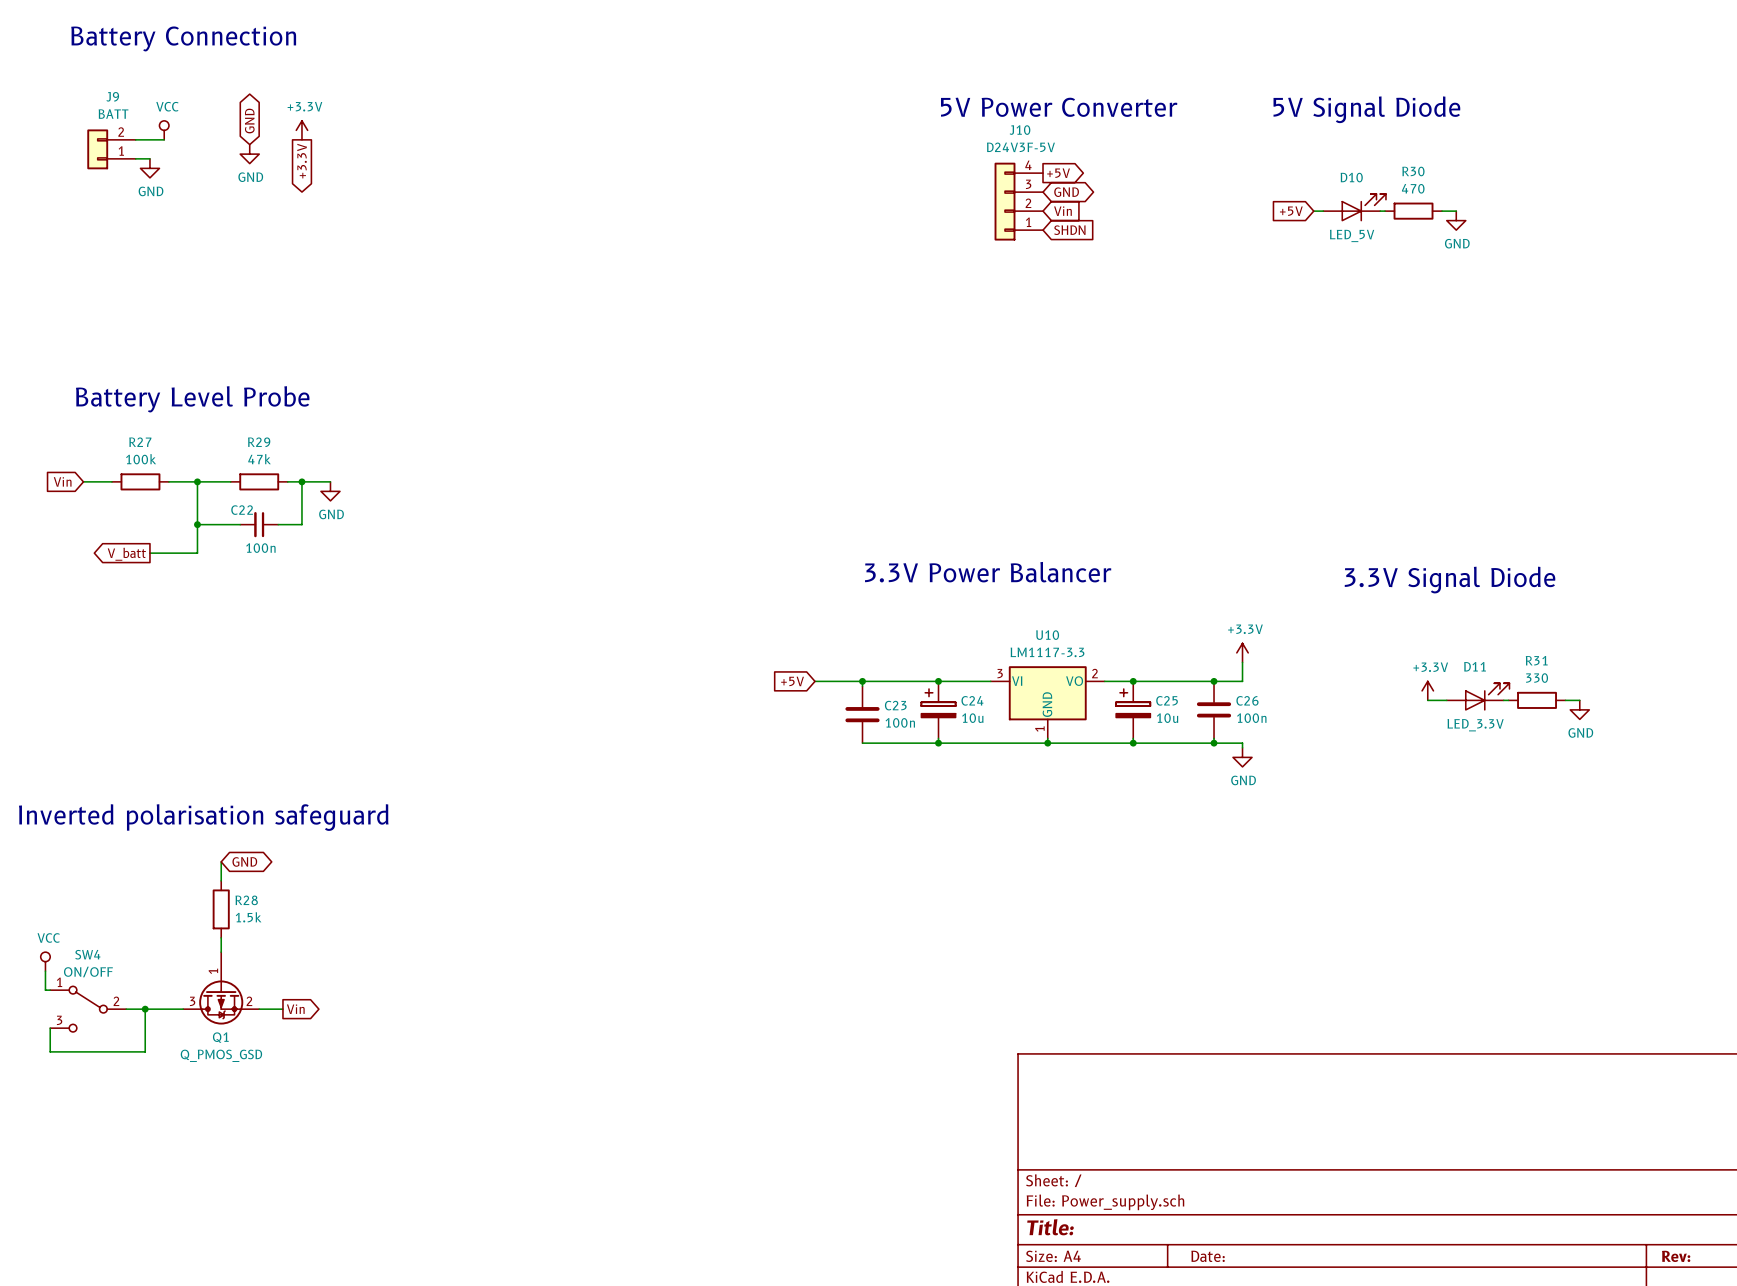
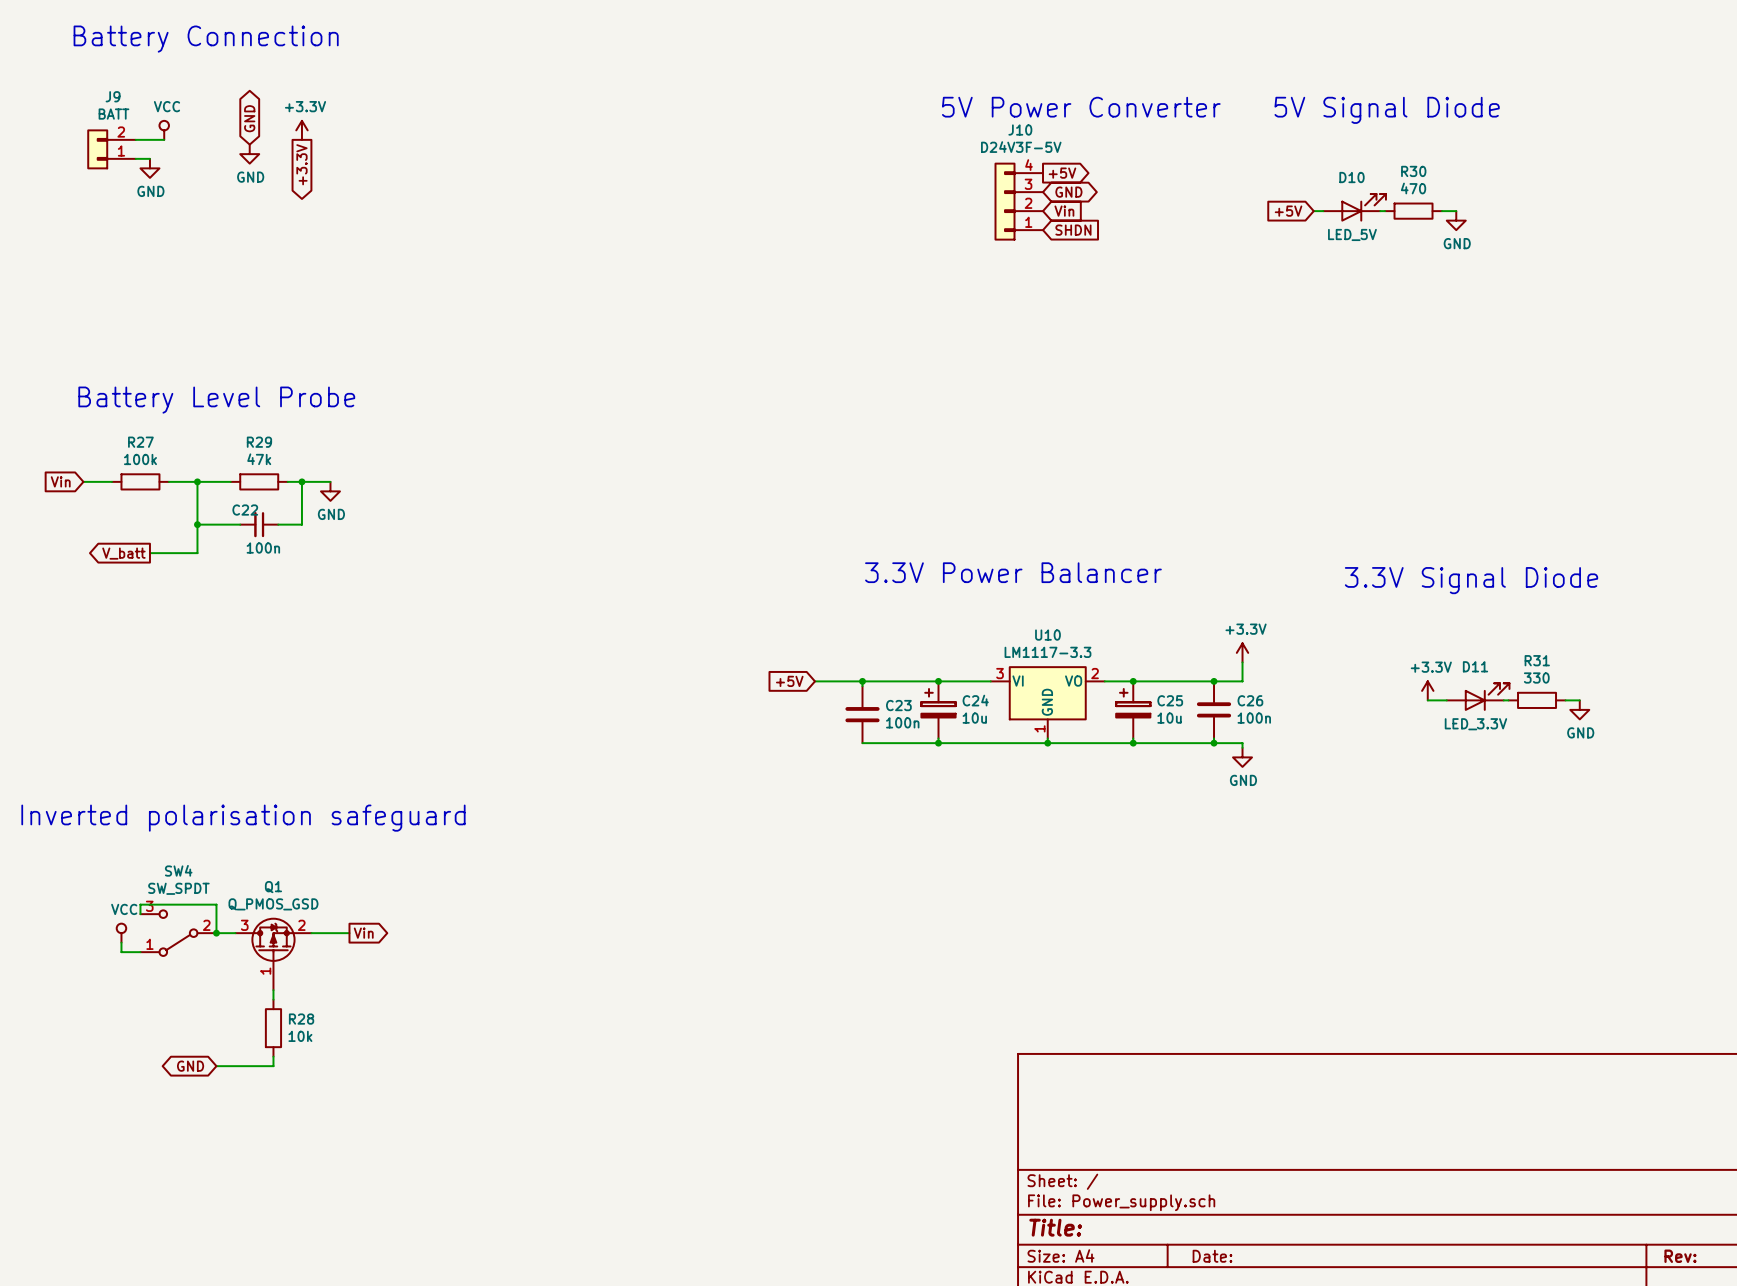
wire: (221, 861) (221, 880) -> none
global label: GND (244, 861) -> none
R28 position: (221, 909) -> (273, 1028)
wire: none -> (140, 914) (140, 904) (216, 904) (216, 933) (235, 933)
R28 value: 1.5k (248, 917) -> 10k (300, 1036)
junction: none -> (216, 933)
wire: none -> (311, 933) (349, 933)
wire: (221, 937) (221, 952) -> none
wire: none -> (121, 942) (121, 952) (140, 952)
power symbol position: VCC (45, 961) -> VCC (121, 933)
wire: (45, 971) (45, 990) (50, 990) -> none
SW4 value: ON/OFF (88, 972) -> SW_SPDT (178, 888)
Q1 position: (221, 988) -> (273, 953)
wire: none -> (273, 990) (273, 999)
Q1 flip: as is (221, 1002) -> up-down (273, 939)
SW4 flip: as is (88, 1009) -> up-down (178, 933)
SW4 position: (88, 1009) -> (178, 933)
wire: (126, 1009) (183, 1009) -> none
wire: (145, 1009) (145, 1051) (50, 1051) (50, 1028) -> none
junction: (145, 1009) -> none
global label position: Vin (295, 1009) -> Vin (363, 933)
Q1 name position: Q1 (220, 1037) -> Q1 (273, 887)
Q1 value position: Q_PMOS_GSD (221, 1055) -> Q_PMOS_GSD (273, 904)
wire: none -> (273, 1056) (273, 1066) (216, 1066)
global label: none -> GND (190, 1066)

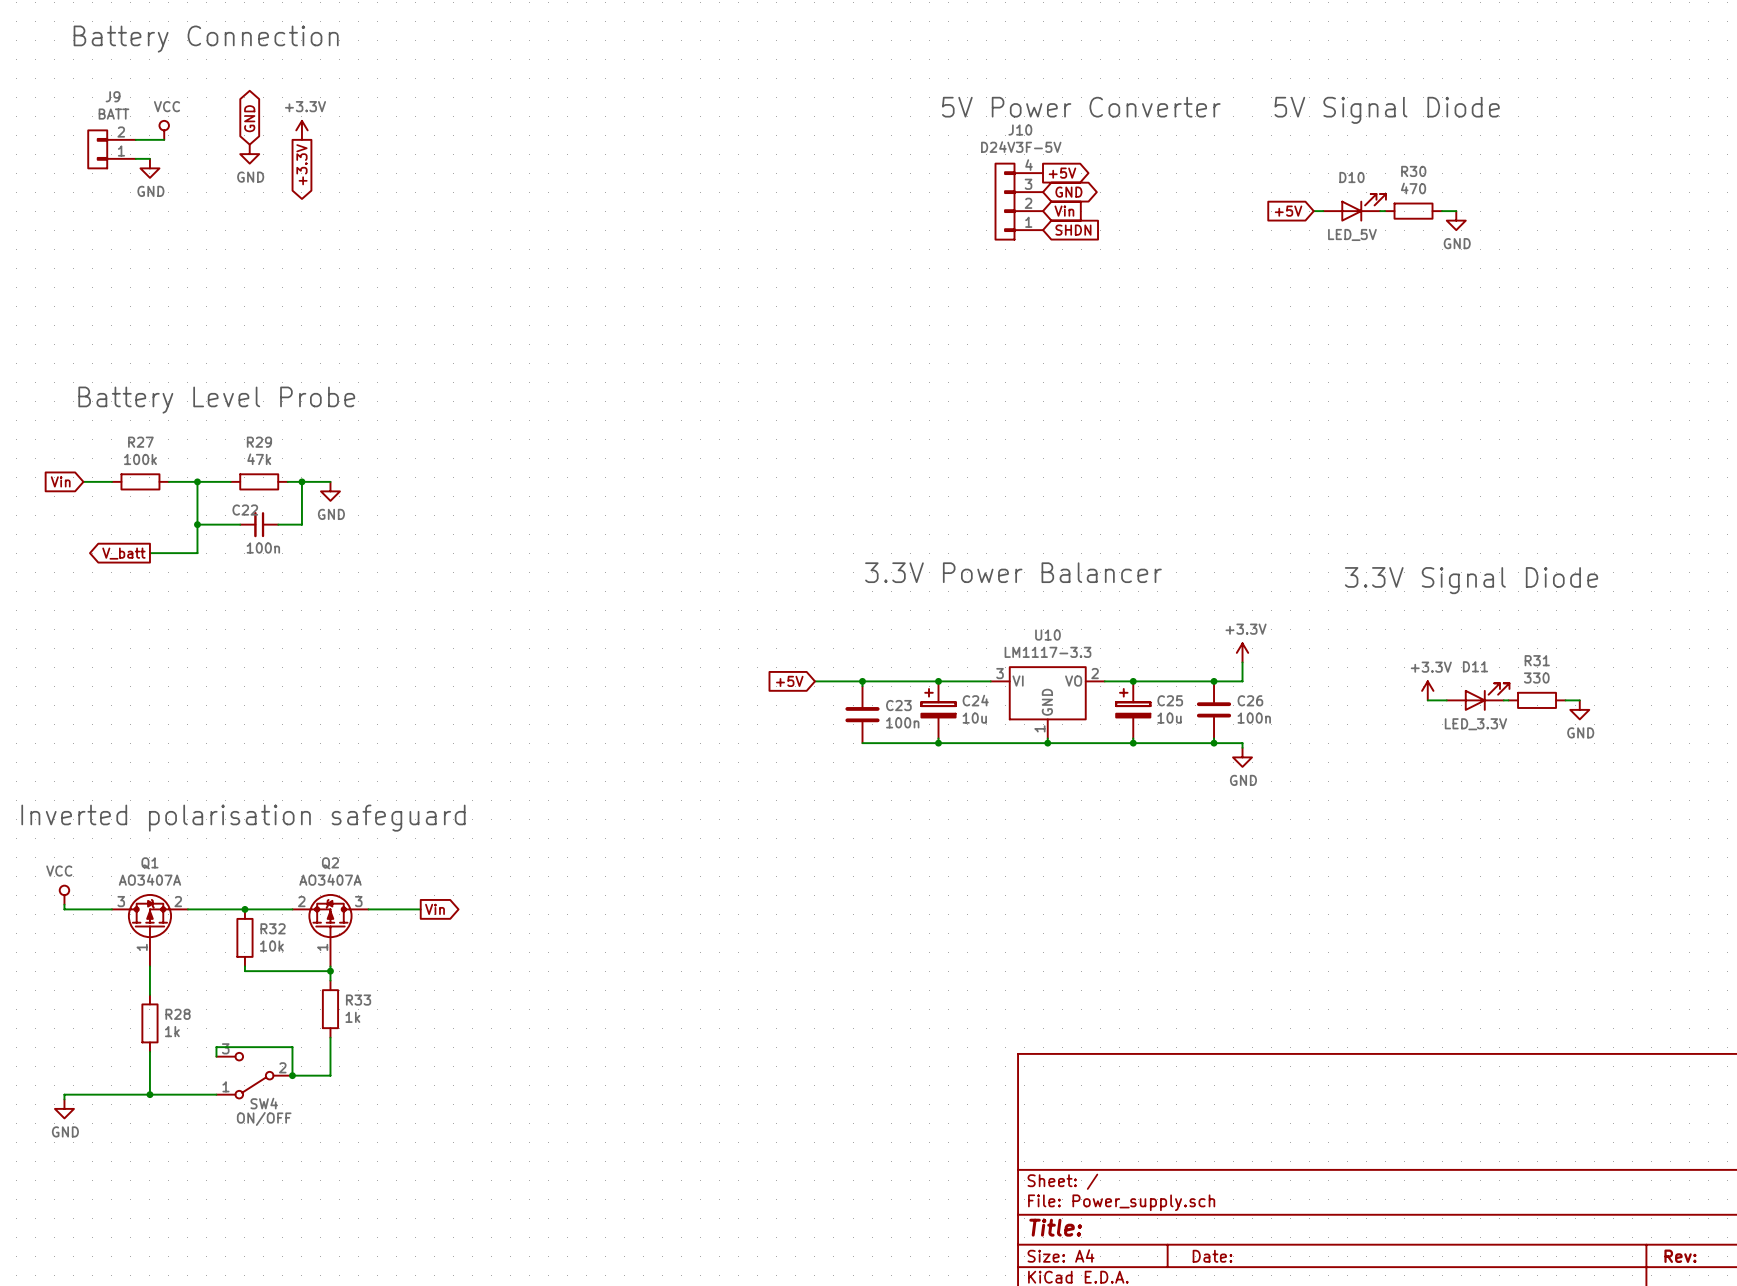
SW4 name position: SW4 (178, 870) -> SW4 (264, 1103)
SW4 value: SW_SPDT (178, 888) -> ON/OFF (264, 1118)
wire: none -> (64, 904) (64, 909) (111, 909)
Q1 value: Q_PMOS_GSD (273, 904) -> AO3407A (149, 879)
power symbol text position: VCC (124, 909) -> VCC (59, 871)
wire: none -> (187, 909) (292, 909)
wire: none -> (368, 909) (420, 909)
wire: (140, 914) (140, 904) (216, 904) (216, 933) (235, 933) -> none
Q2: none -> AO3407A (330, 930)
power symbol position: VCC (121, 933) -> VCC (64, 895)
SW4 position: (178, 933) -> (254, 1075)
junction position: (216, 933) -> (244, 909)
wire: (311, 933) (349, 933) -> none
global label position: Vin (363, 933) -> Vin (434, 909)
R32: none -> 10k (244, 937)
wire: (121, 942) (121, 952) (140, 952) -> none
Q1 position: (273, 953) -> (149, 930)
wire: none -> (149, 966) (149, 994)
wire: none -> (244, 966) (244, 971) (330, 971)
wire: none -> (330, 966) (330, 980)
junction: none -> (330, 971)
wire: (273, 990) (273, 999) -> none
R33: none -> 1k (330, 1009)
R28 position: (273, 1028) -> (149, 1023)
R28 value: 10k (300, 1036) -> 1k (172, 1031)
wire: none -> (330, 1037) (330, 1075) (292, 1075) (292, 1047) (216, 1047) (216, 1056)
wire: none -> (149, 1051) (149, 1094)
wire: (273, 1056) (273, 1066) (216, 1066) -> none
global label: GND (190, 1066) -> none
junction: none -> (292, 1075)
junction: none -> (149, 1094)
wire: none -> (216, 1094) (64, 1094) (64, 1099)
power symbol: none -> GND (64, 1108)

